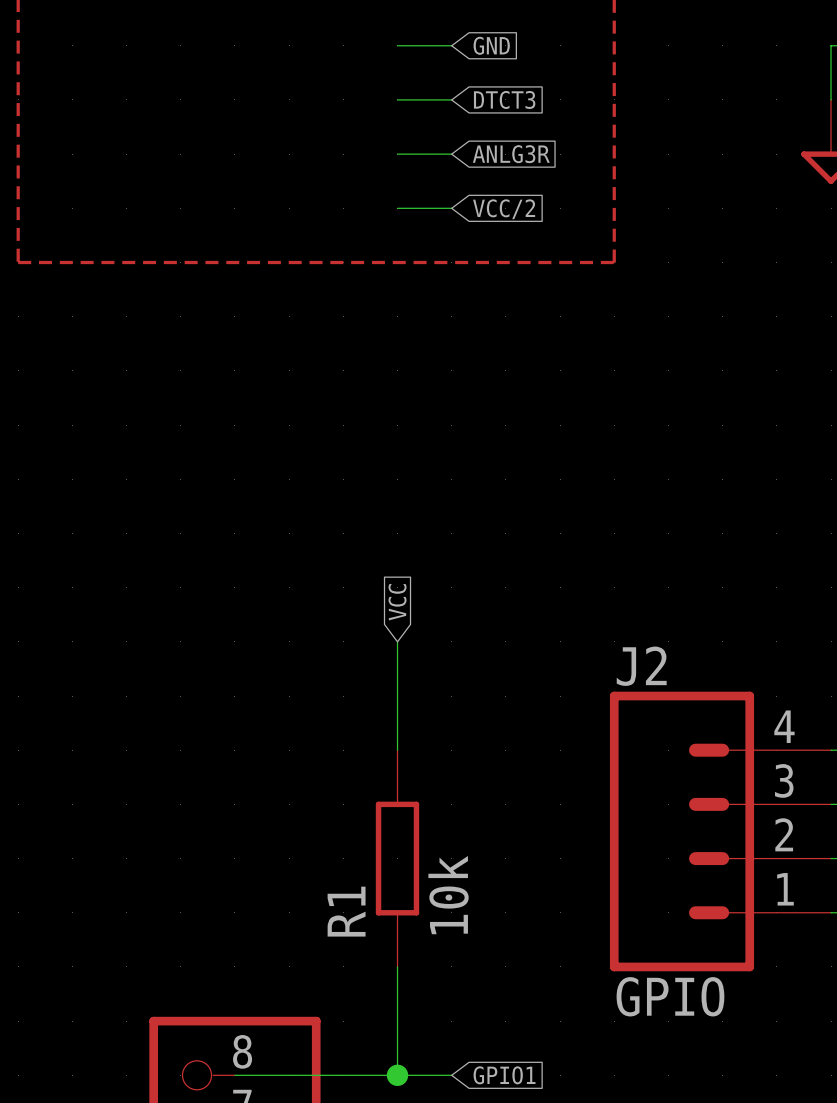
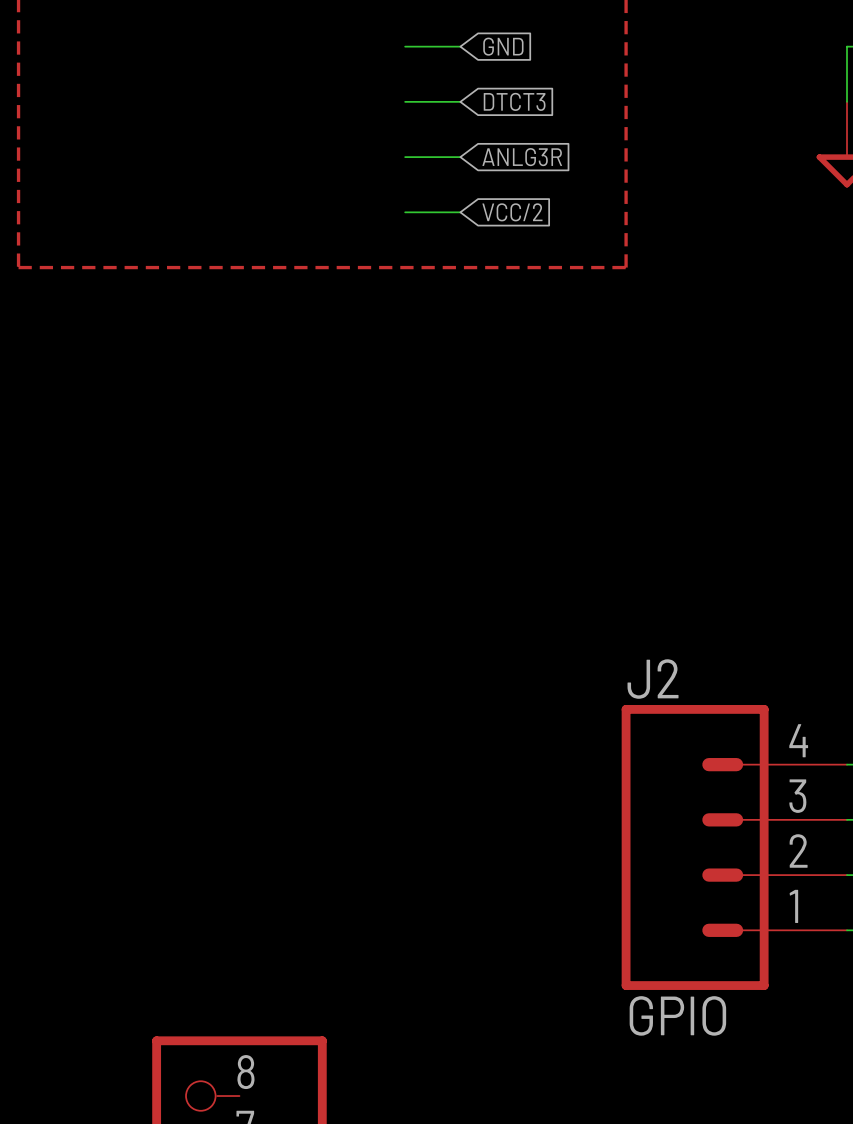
global label: VCC (397, 602) -> none
wire: (397, 641) (397, 750) -> none
R1: 10k (397, 858) -> none
wire: (397, 966) (397, 1075) -> none
wire: (234, 1075) (451, 1075) -> none
junction: (397, 1075) -> none
global label: GPIO1 (504, 1075) -> none

